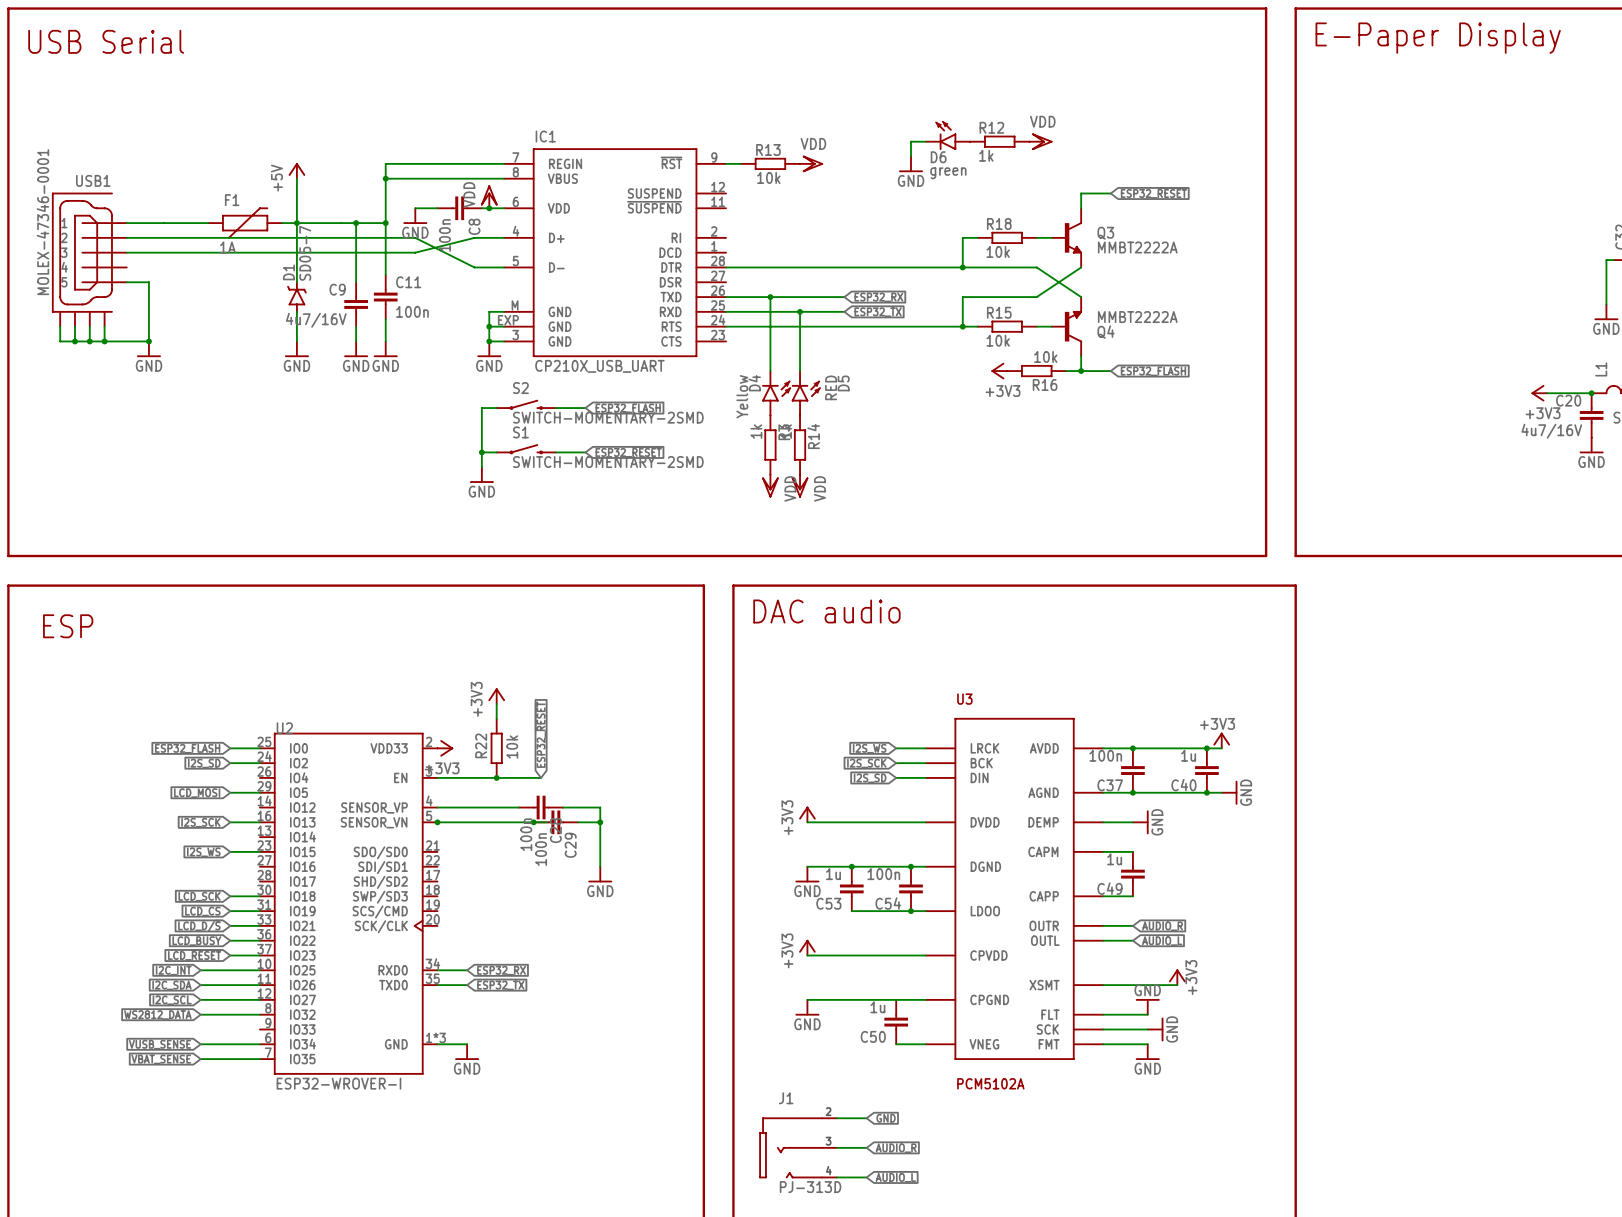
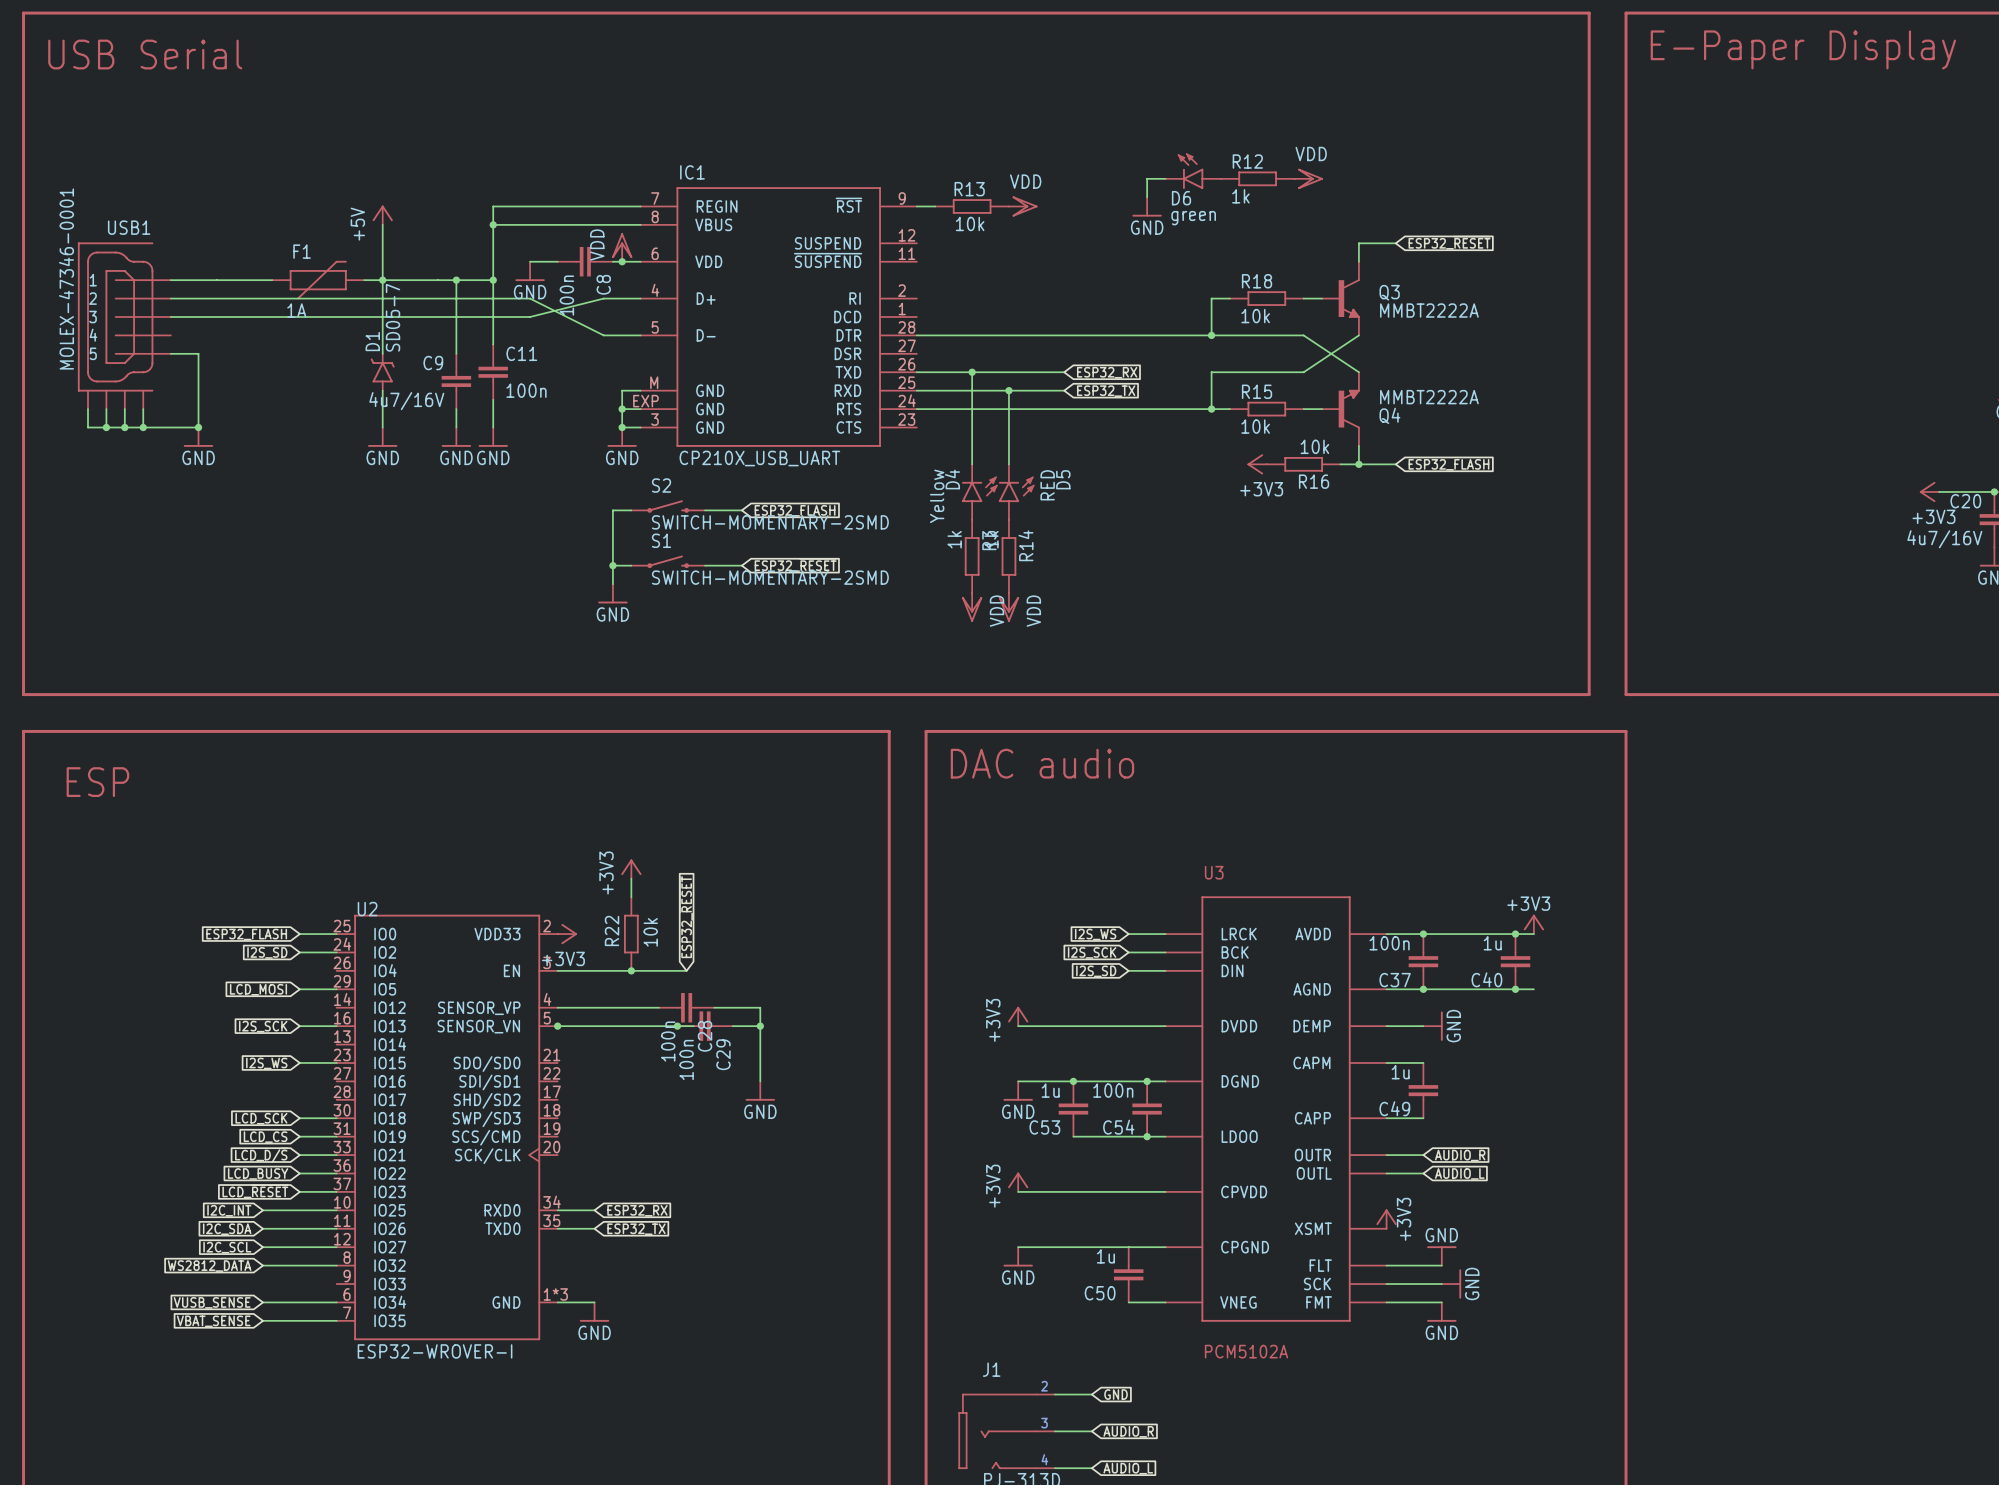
power symbol: GND (1229, 792) -> none
power symbol position: +3V3 (1177, 977) -> +3V3 (1386, 1219)
wire: (1103, 985) (1177, 985) -> none

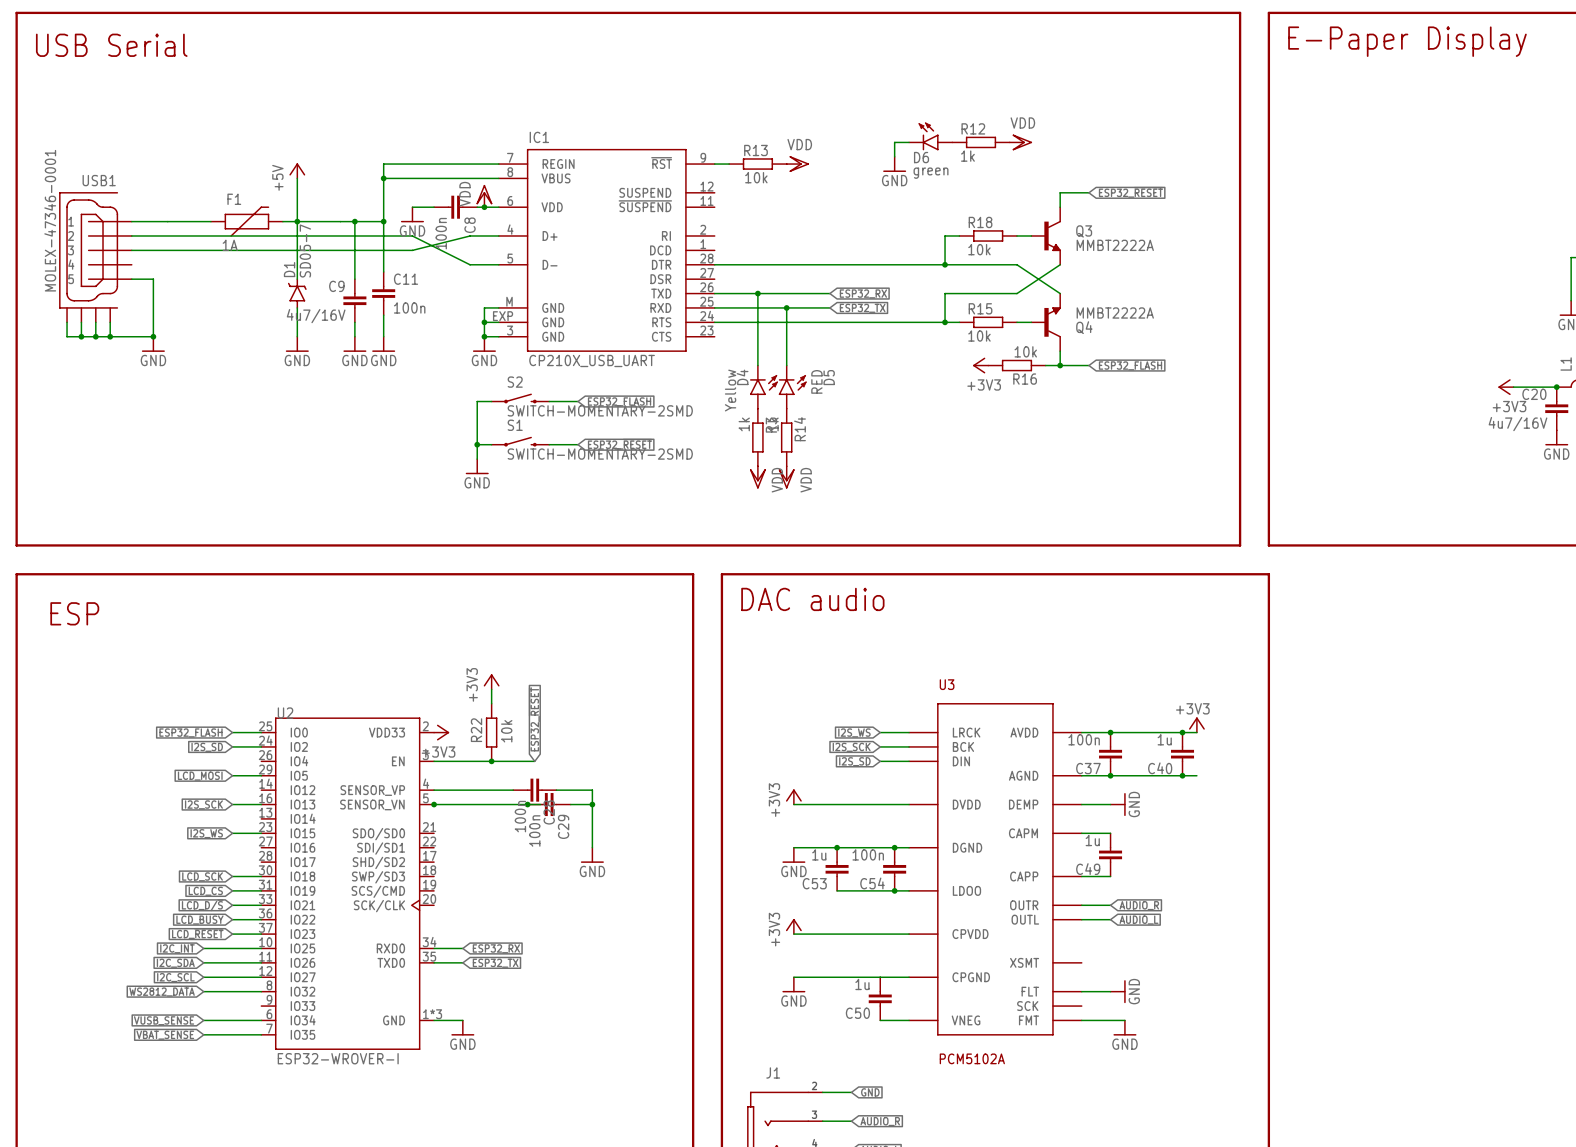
power symbol: +3V3 (1386, 1219) -> none
power symbol: GND (1441, 1255) -> none
power symbol: none -> GND (1118, 991)
wire: (1386, 1284) (1441, 1284) -> none
power symbol: GND (1451, 1284) -> none

